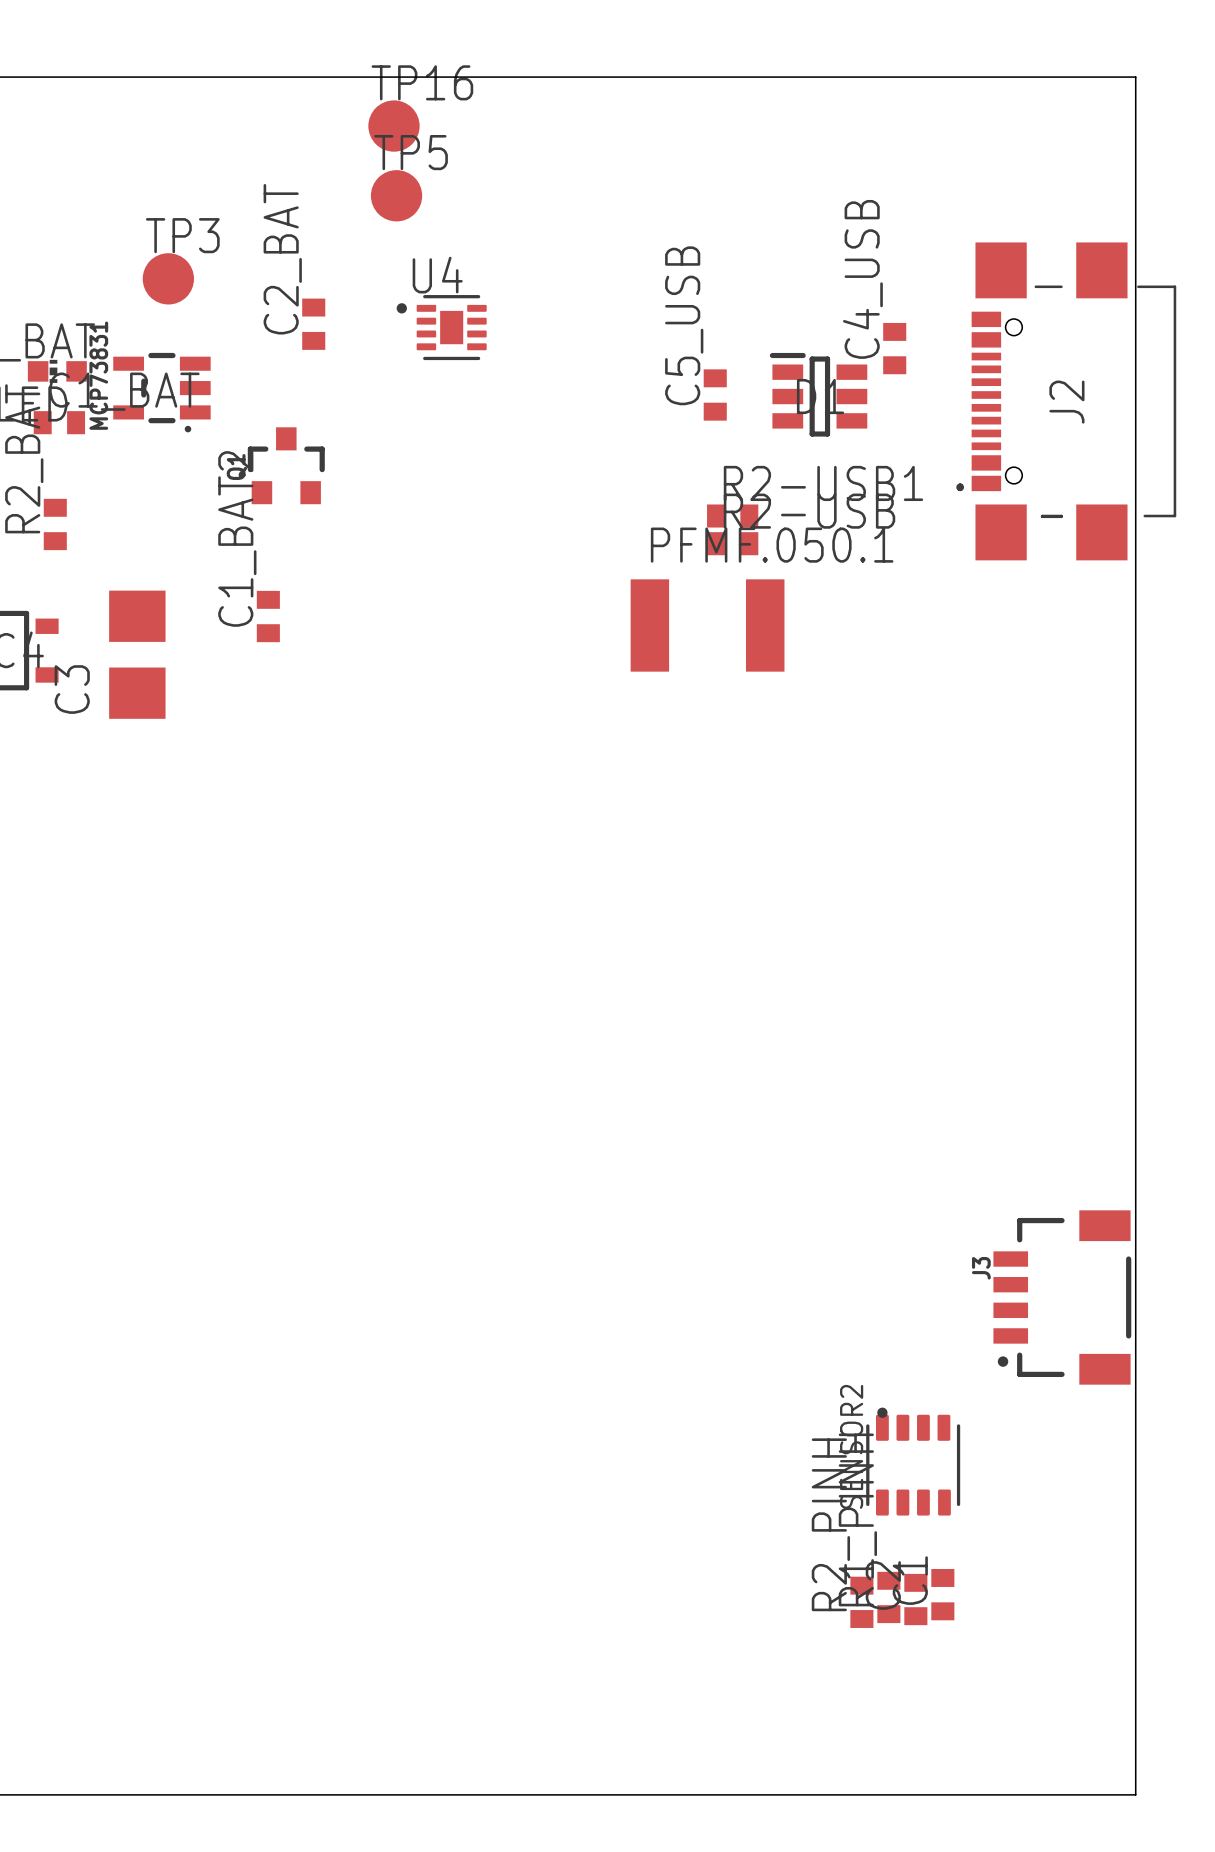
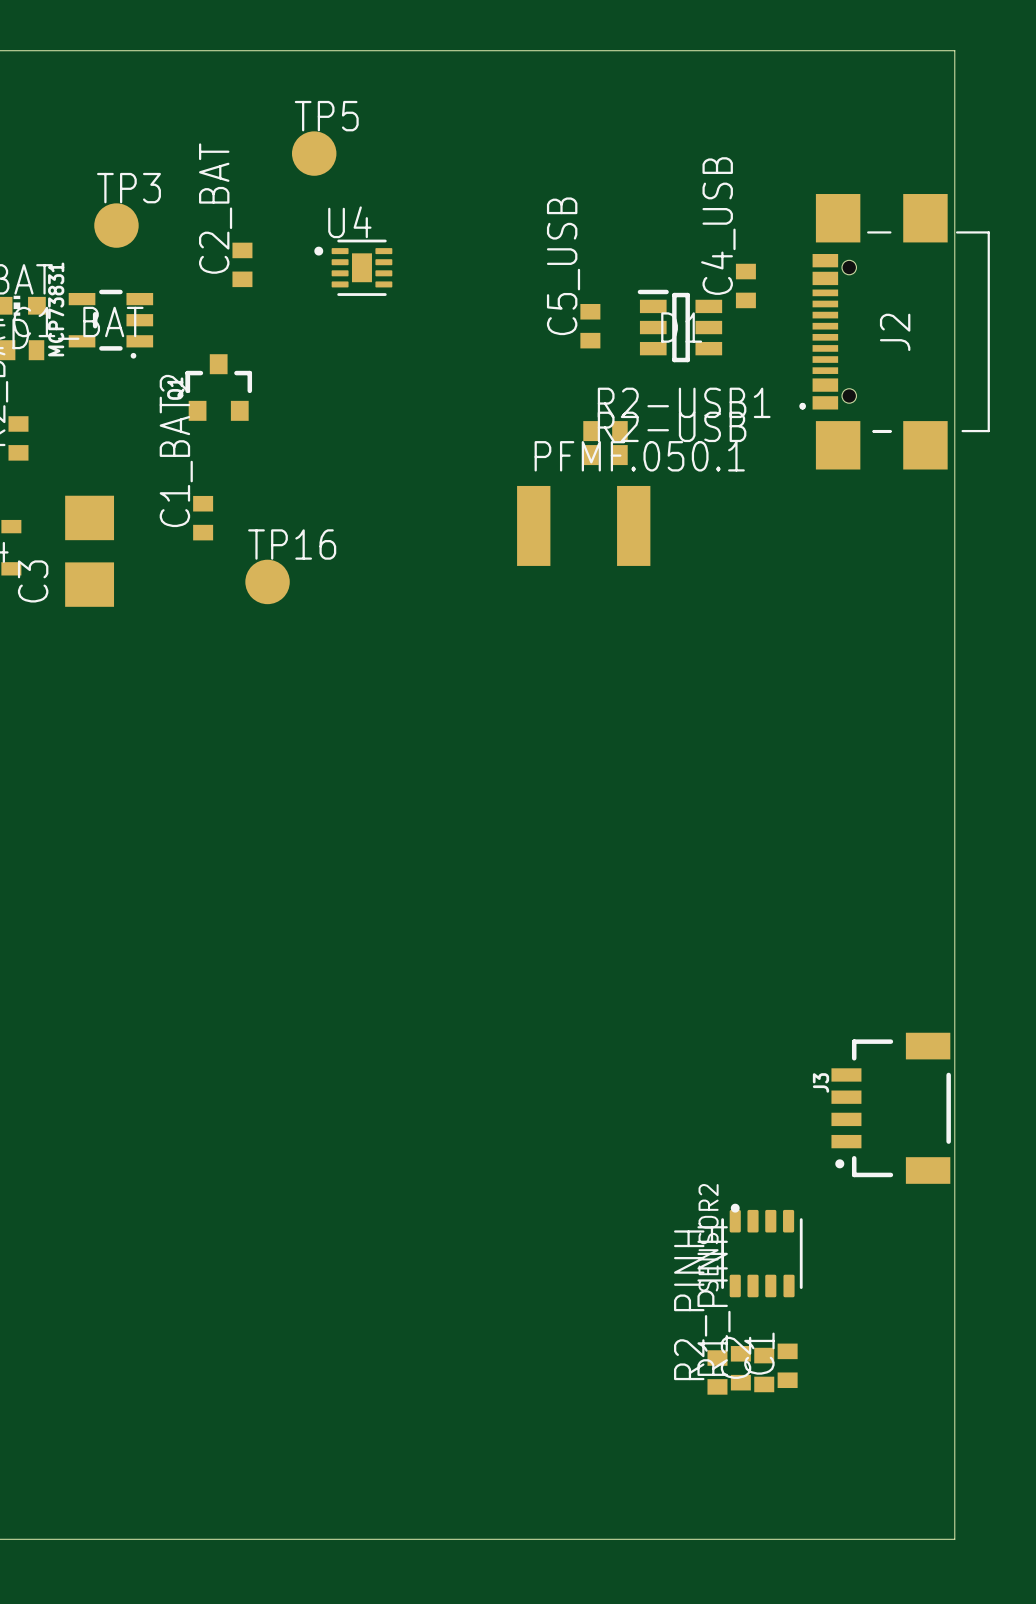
TP16 position: (393, 126) -> (267, 581)

